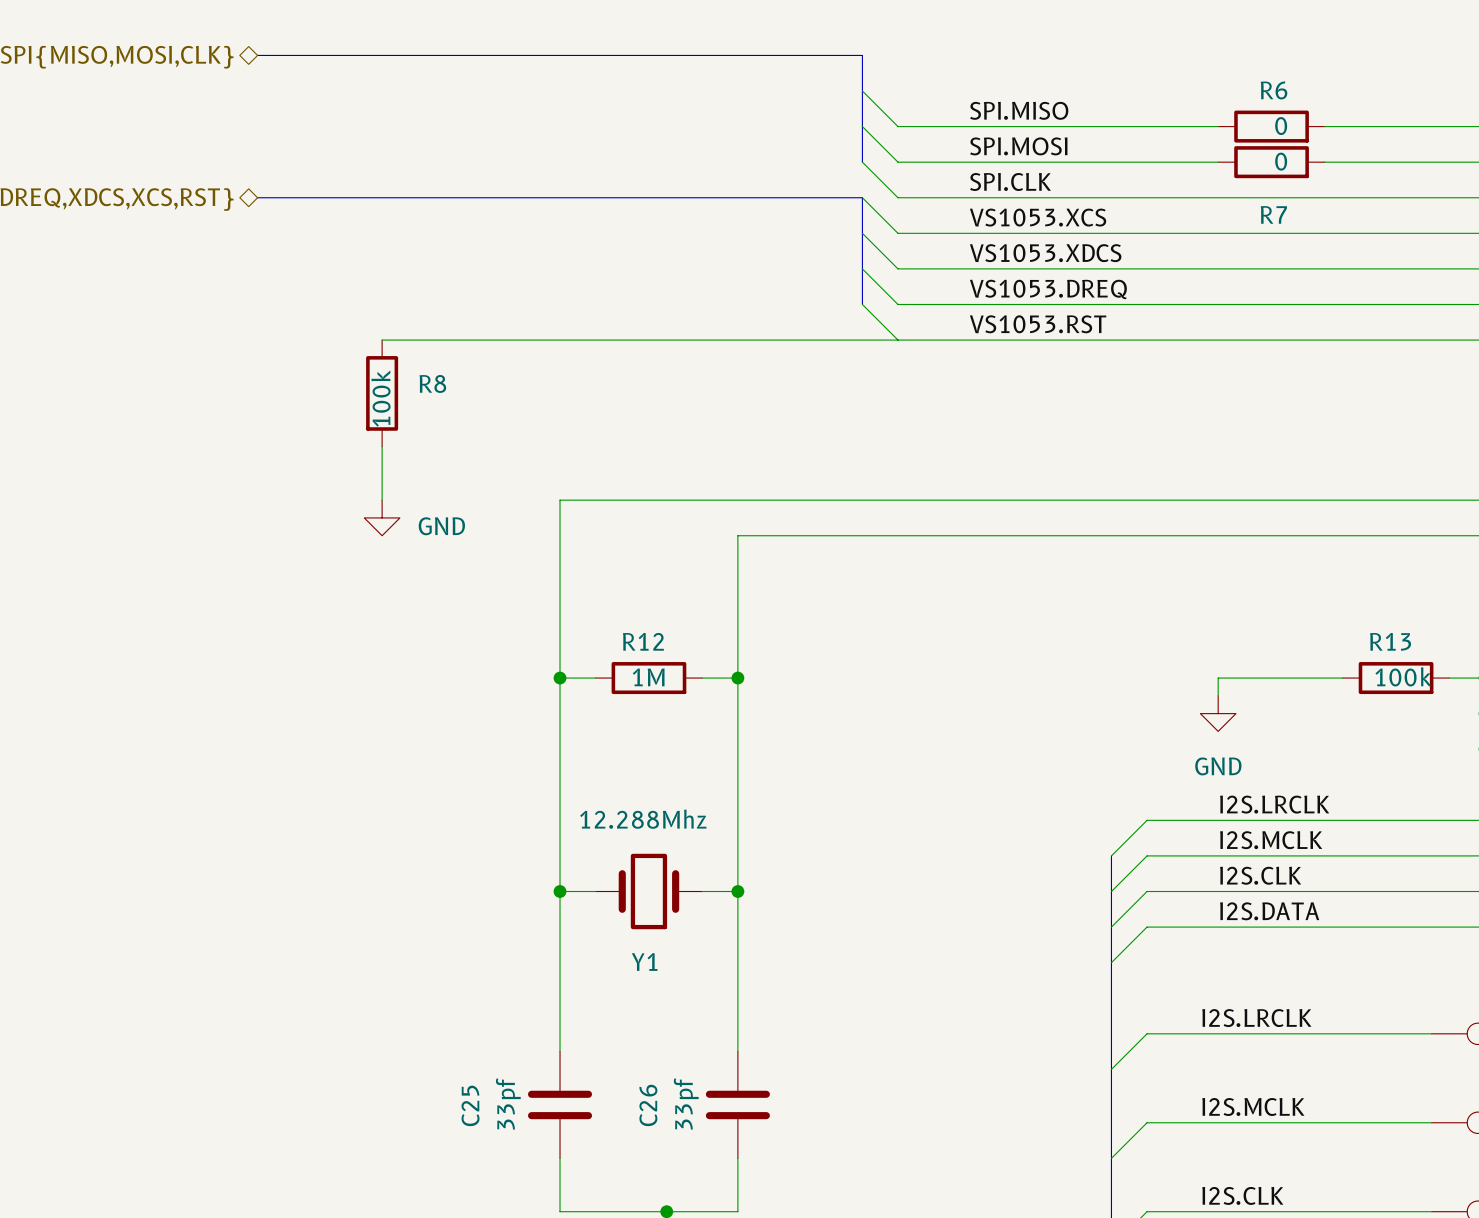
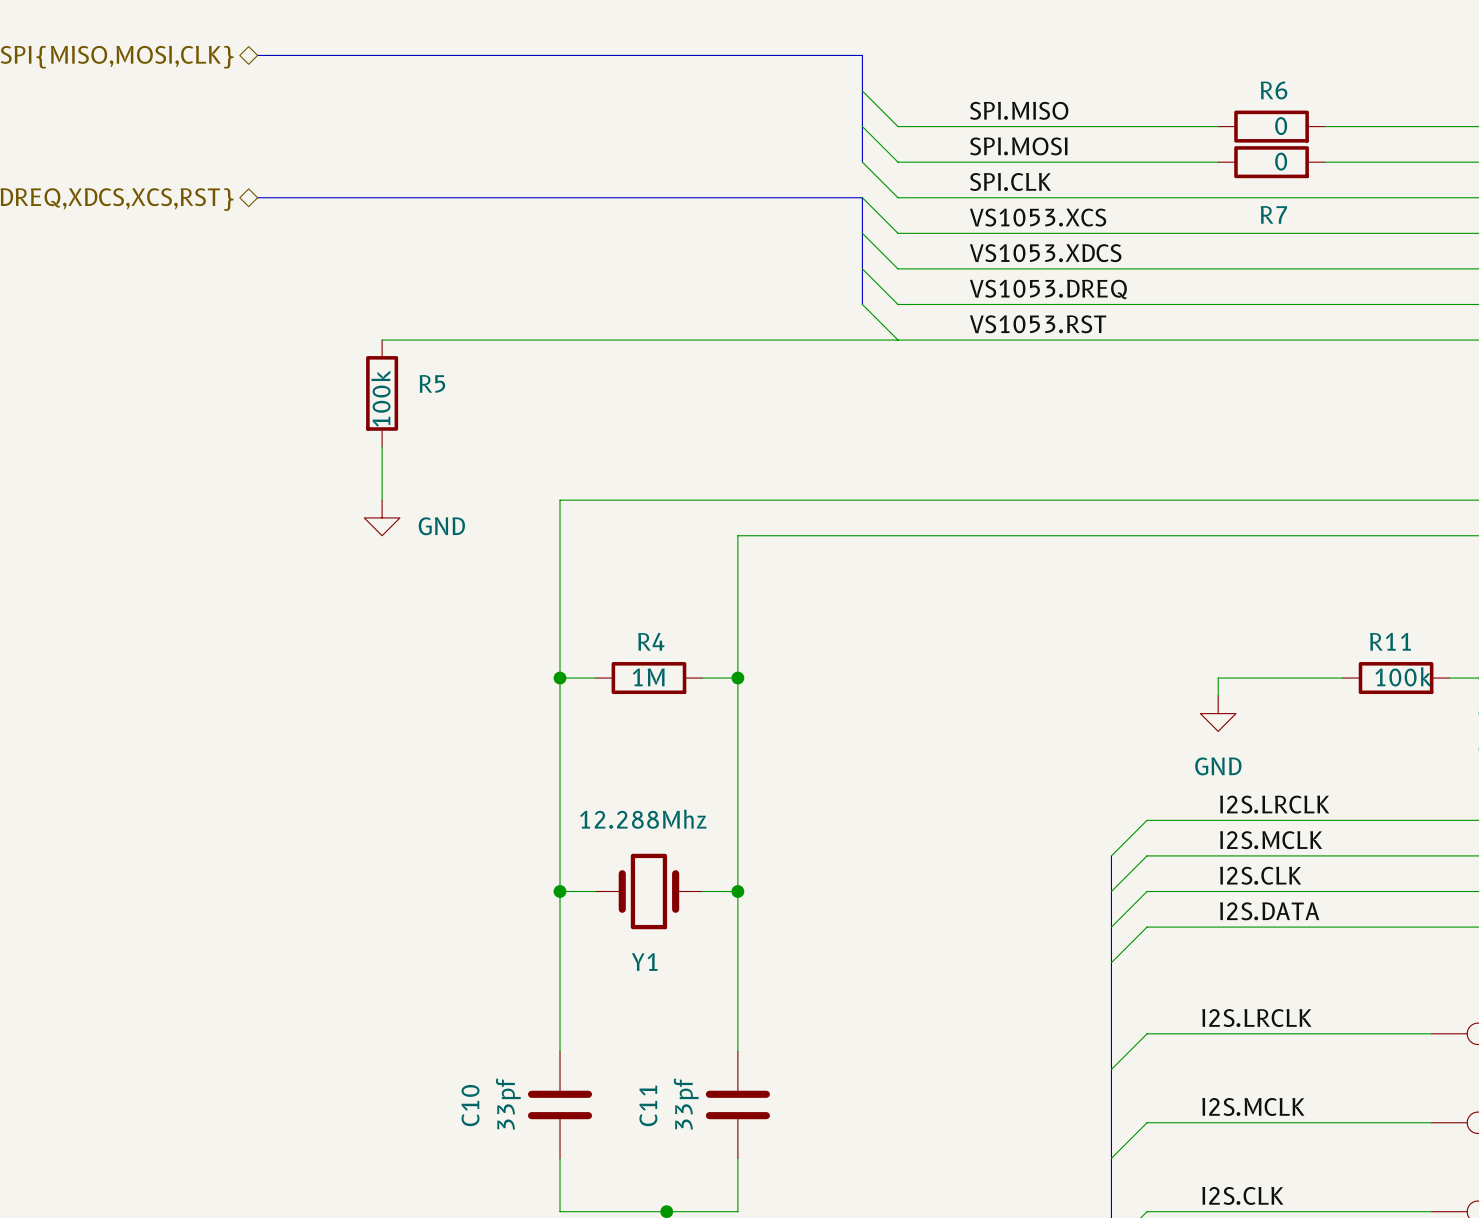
R8 name: R8 (432, 383) -> R5 (432, 383)
R12 name: R12 (643, 641) -> R4 (651, 641)
R13 name: R13 (1390, 641) -> R11 (1390, 641)
C25 name: C25 (470, 1105) -> C10 (470, 1105)
C26 name: C26 (648, 1105) -> C11 (648, 1105)

